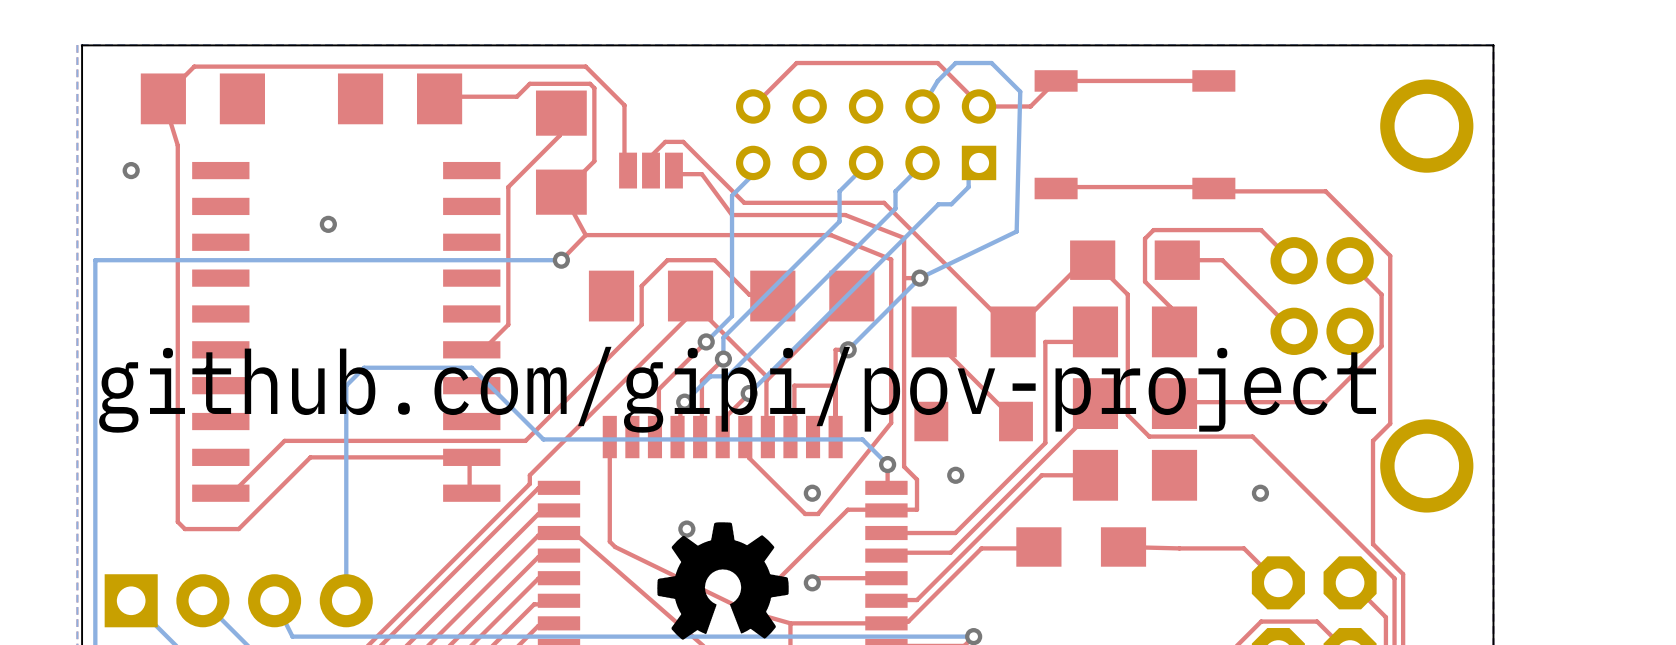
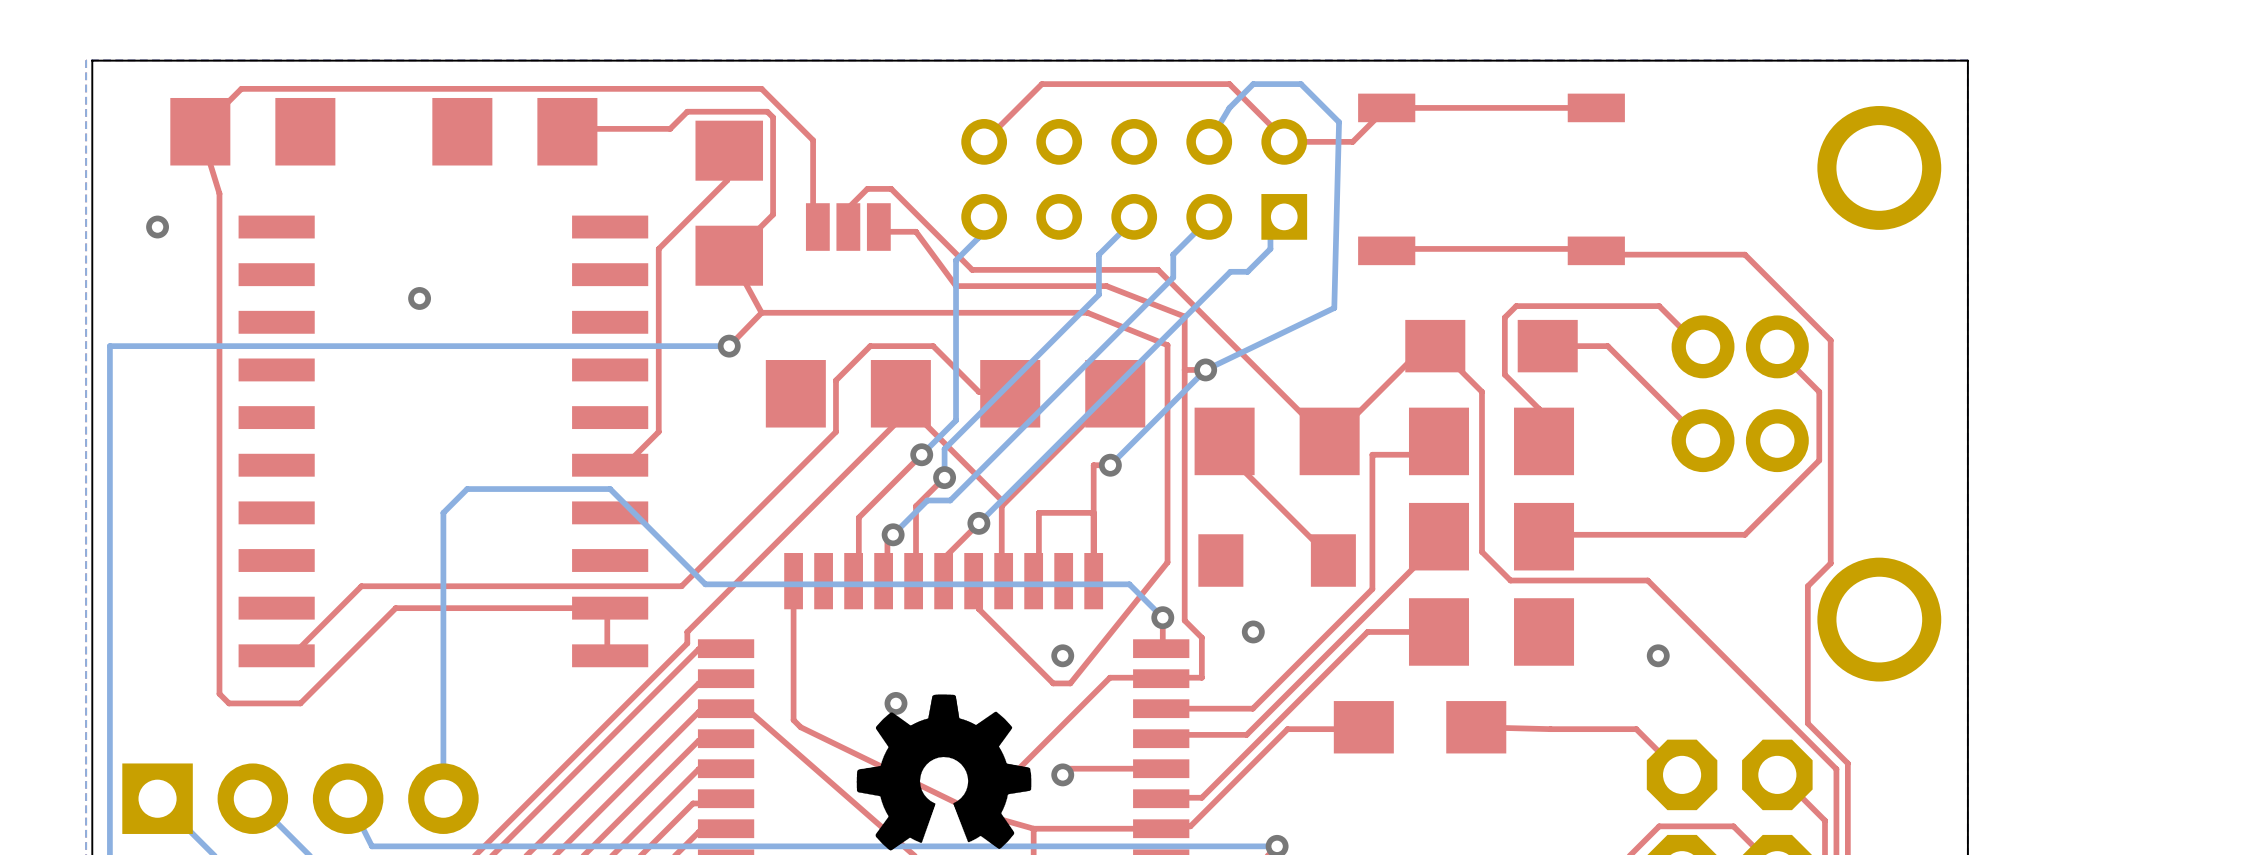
text: github.com/gipi/pov-project (737, 389) -> none

